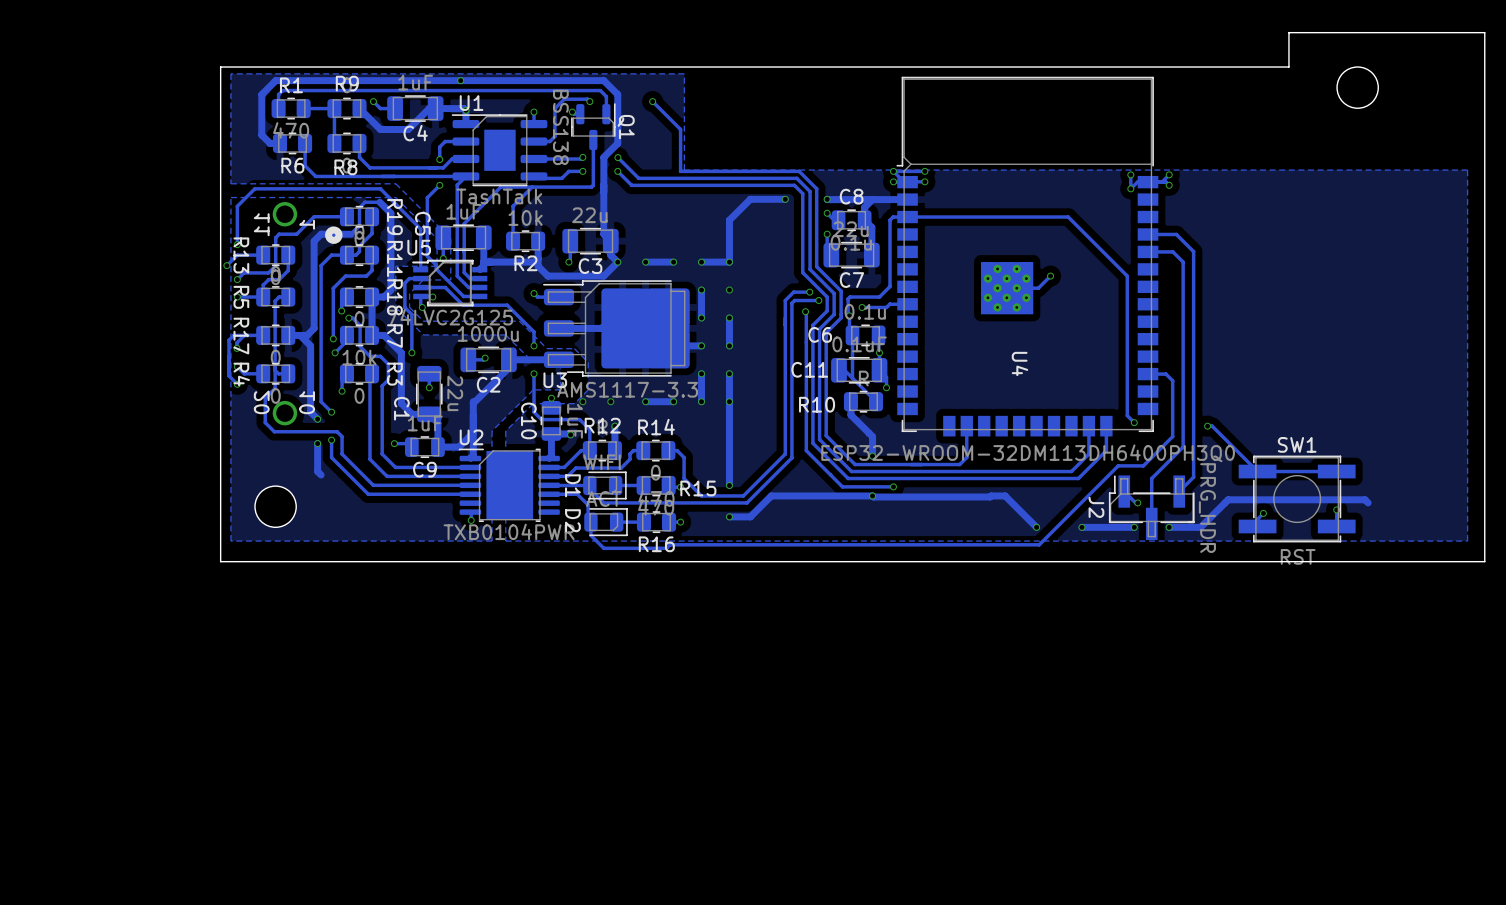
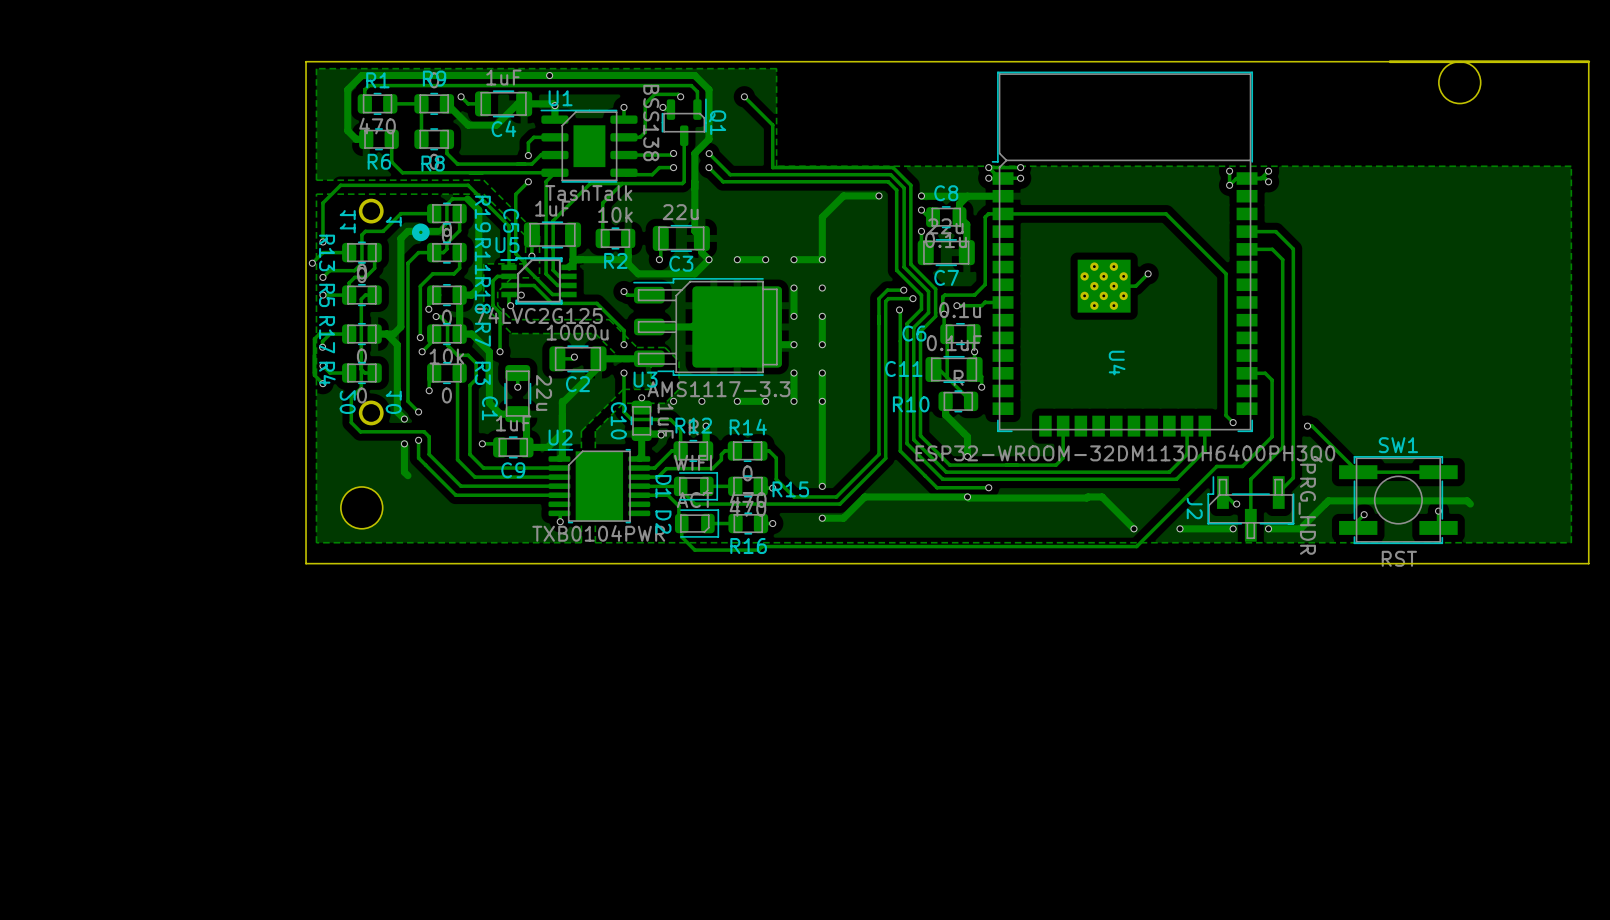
board edge: (1484, 67) (1484, 32) (1288, 32) (1288, 67) -> (1588, 61) (1390, 61)

